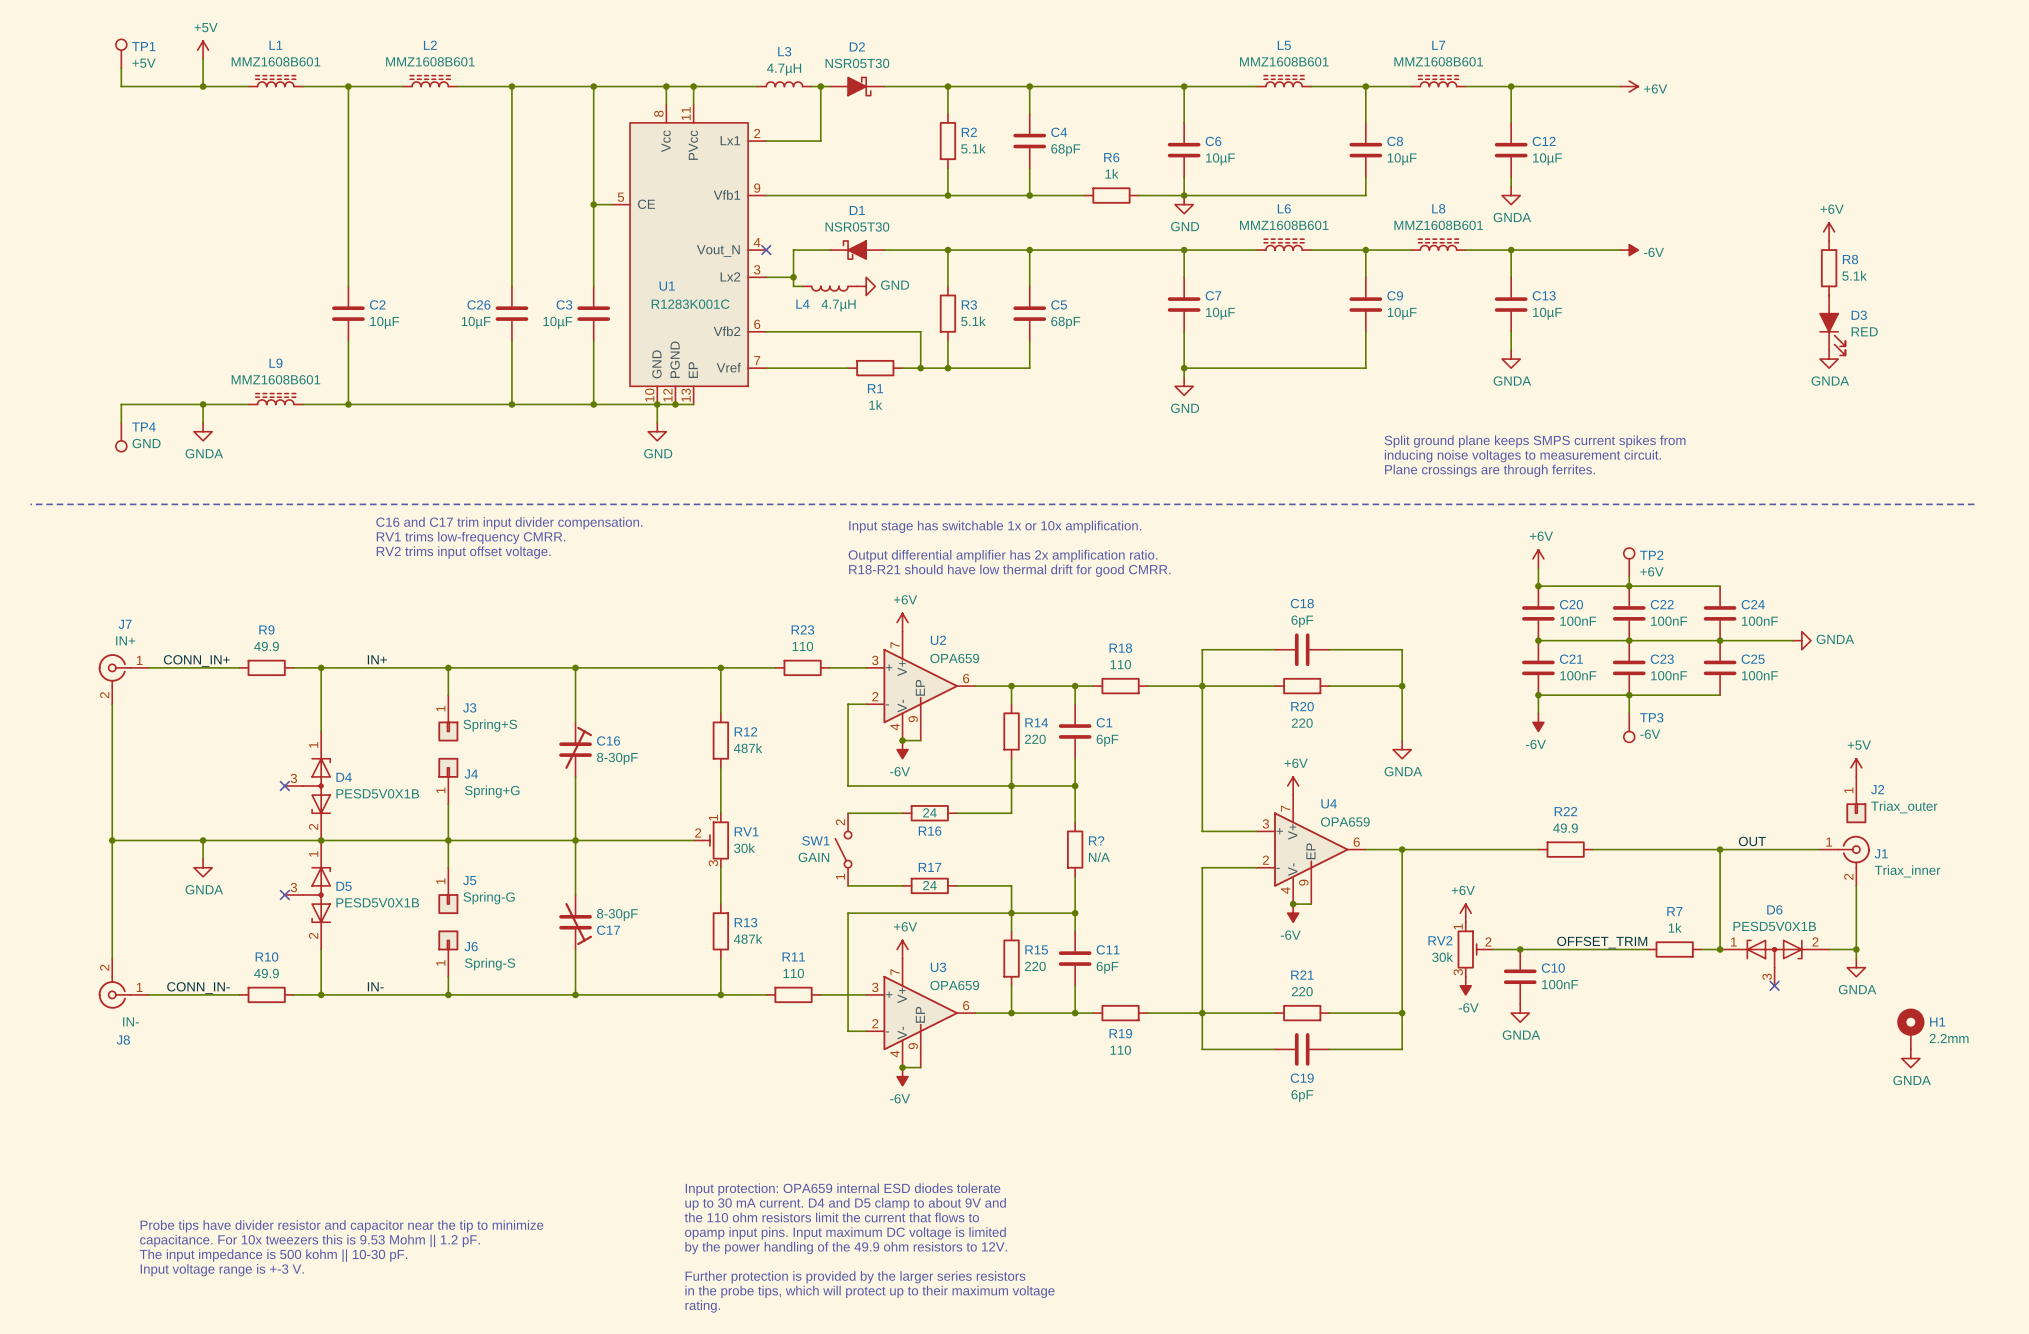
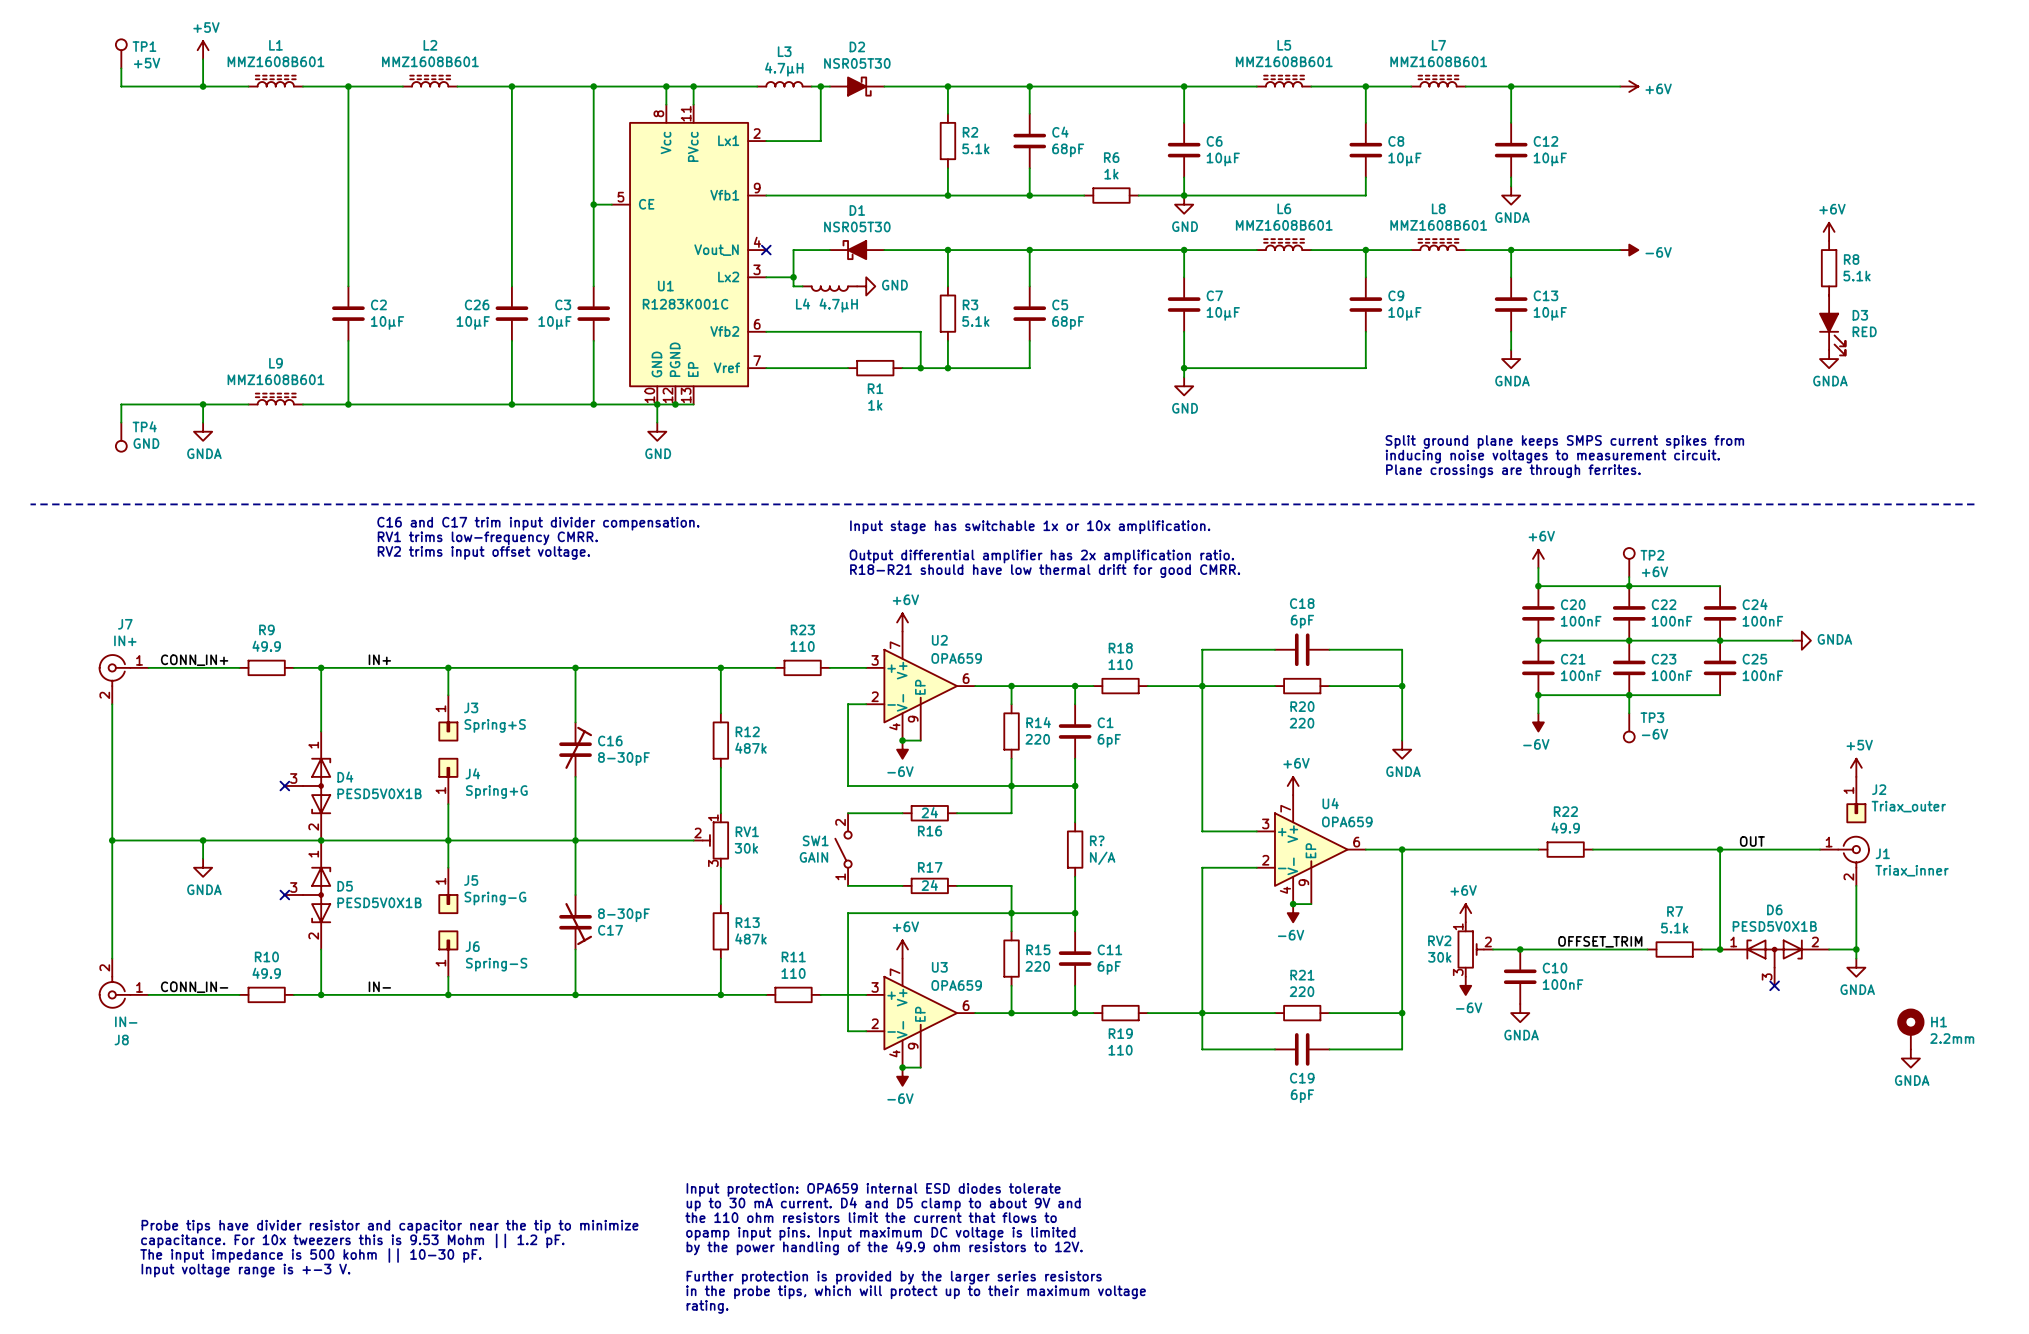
R7 value: 1k (1675, 927) -> 5.1k (1674, 928)

